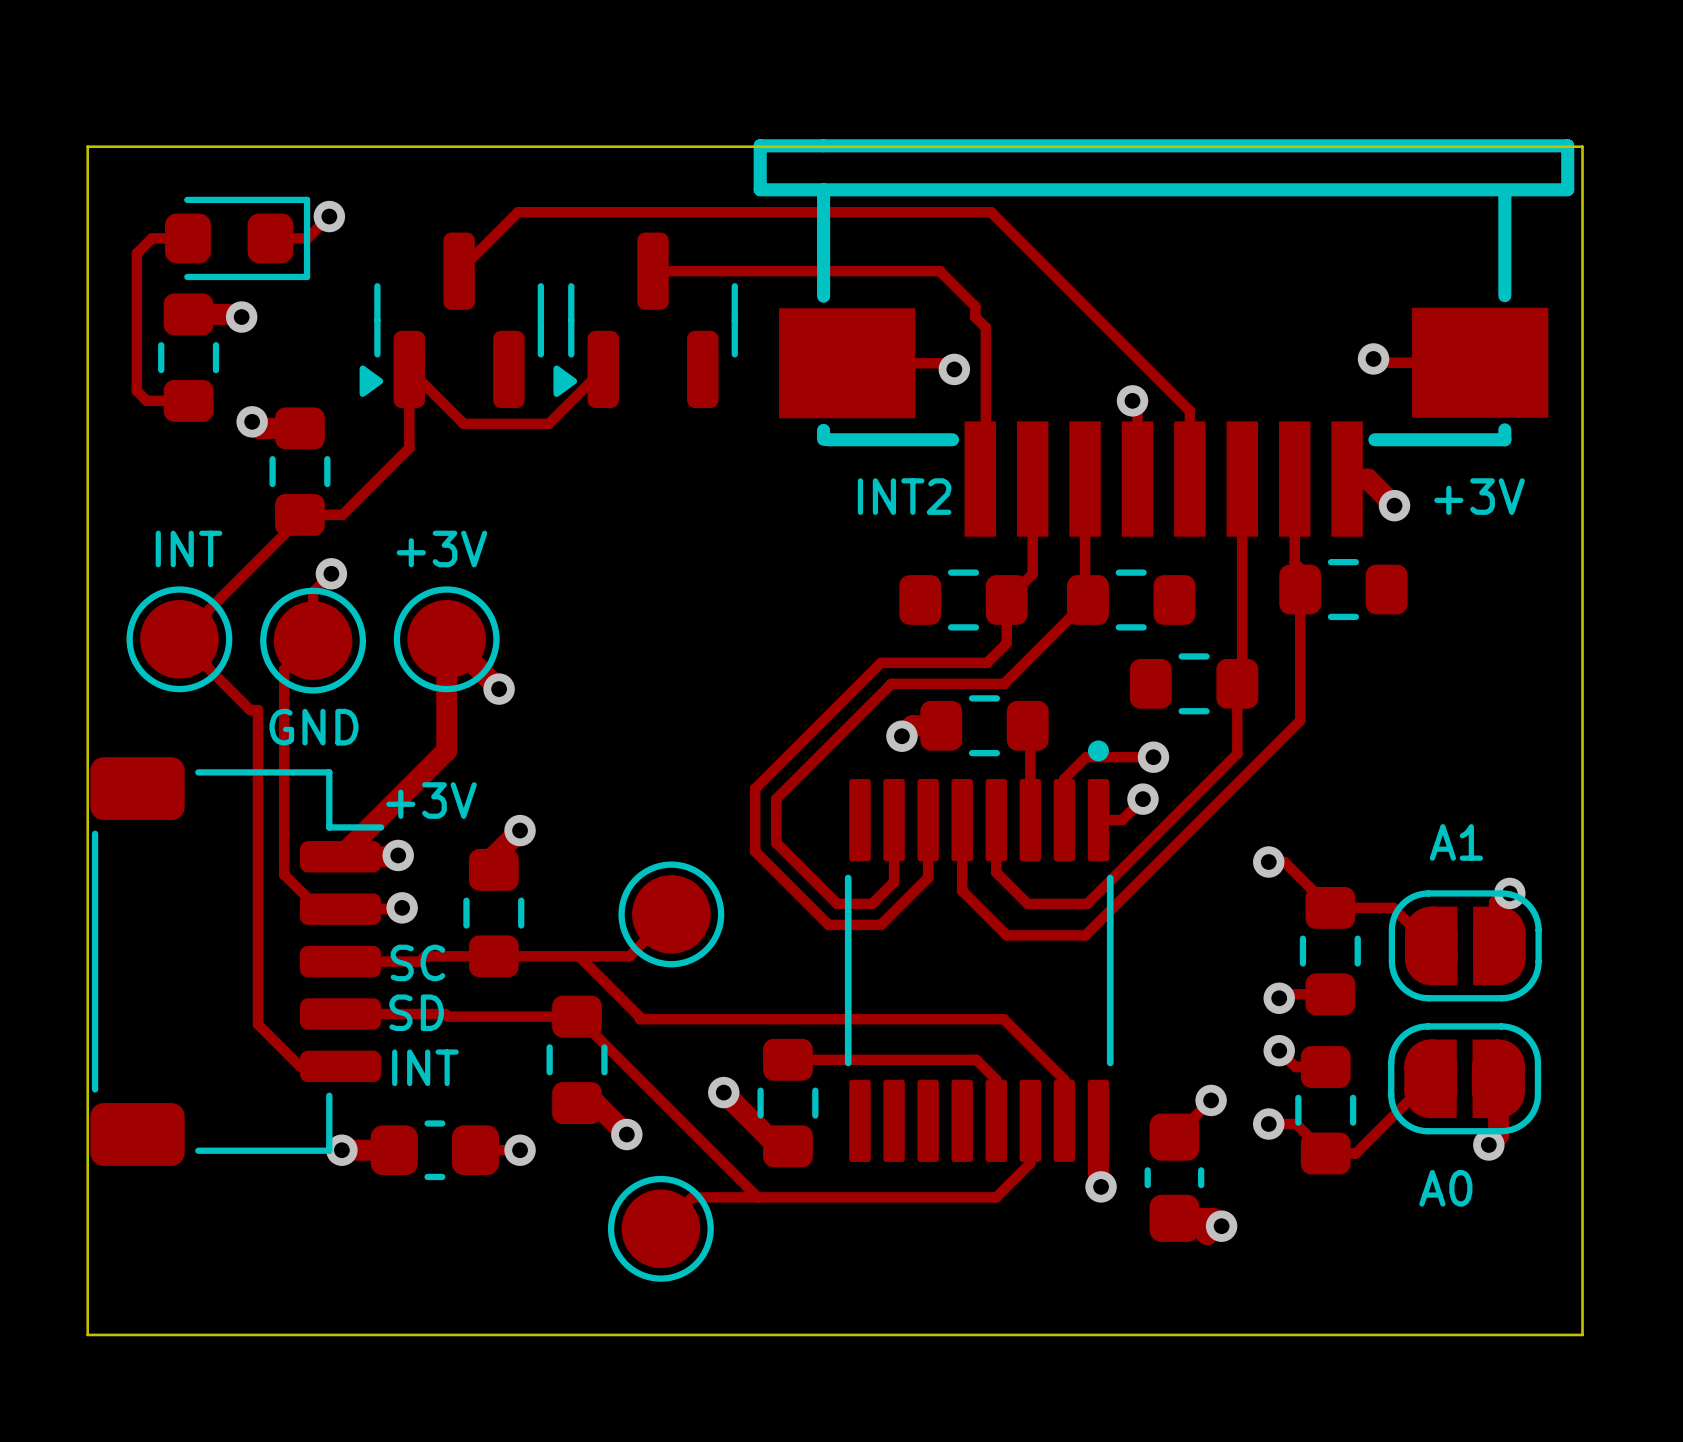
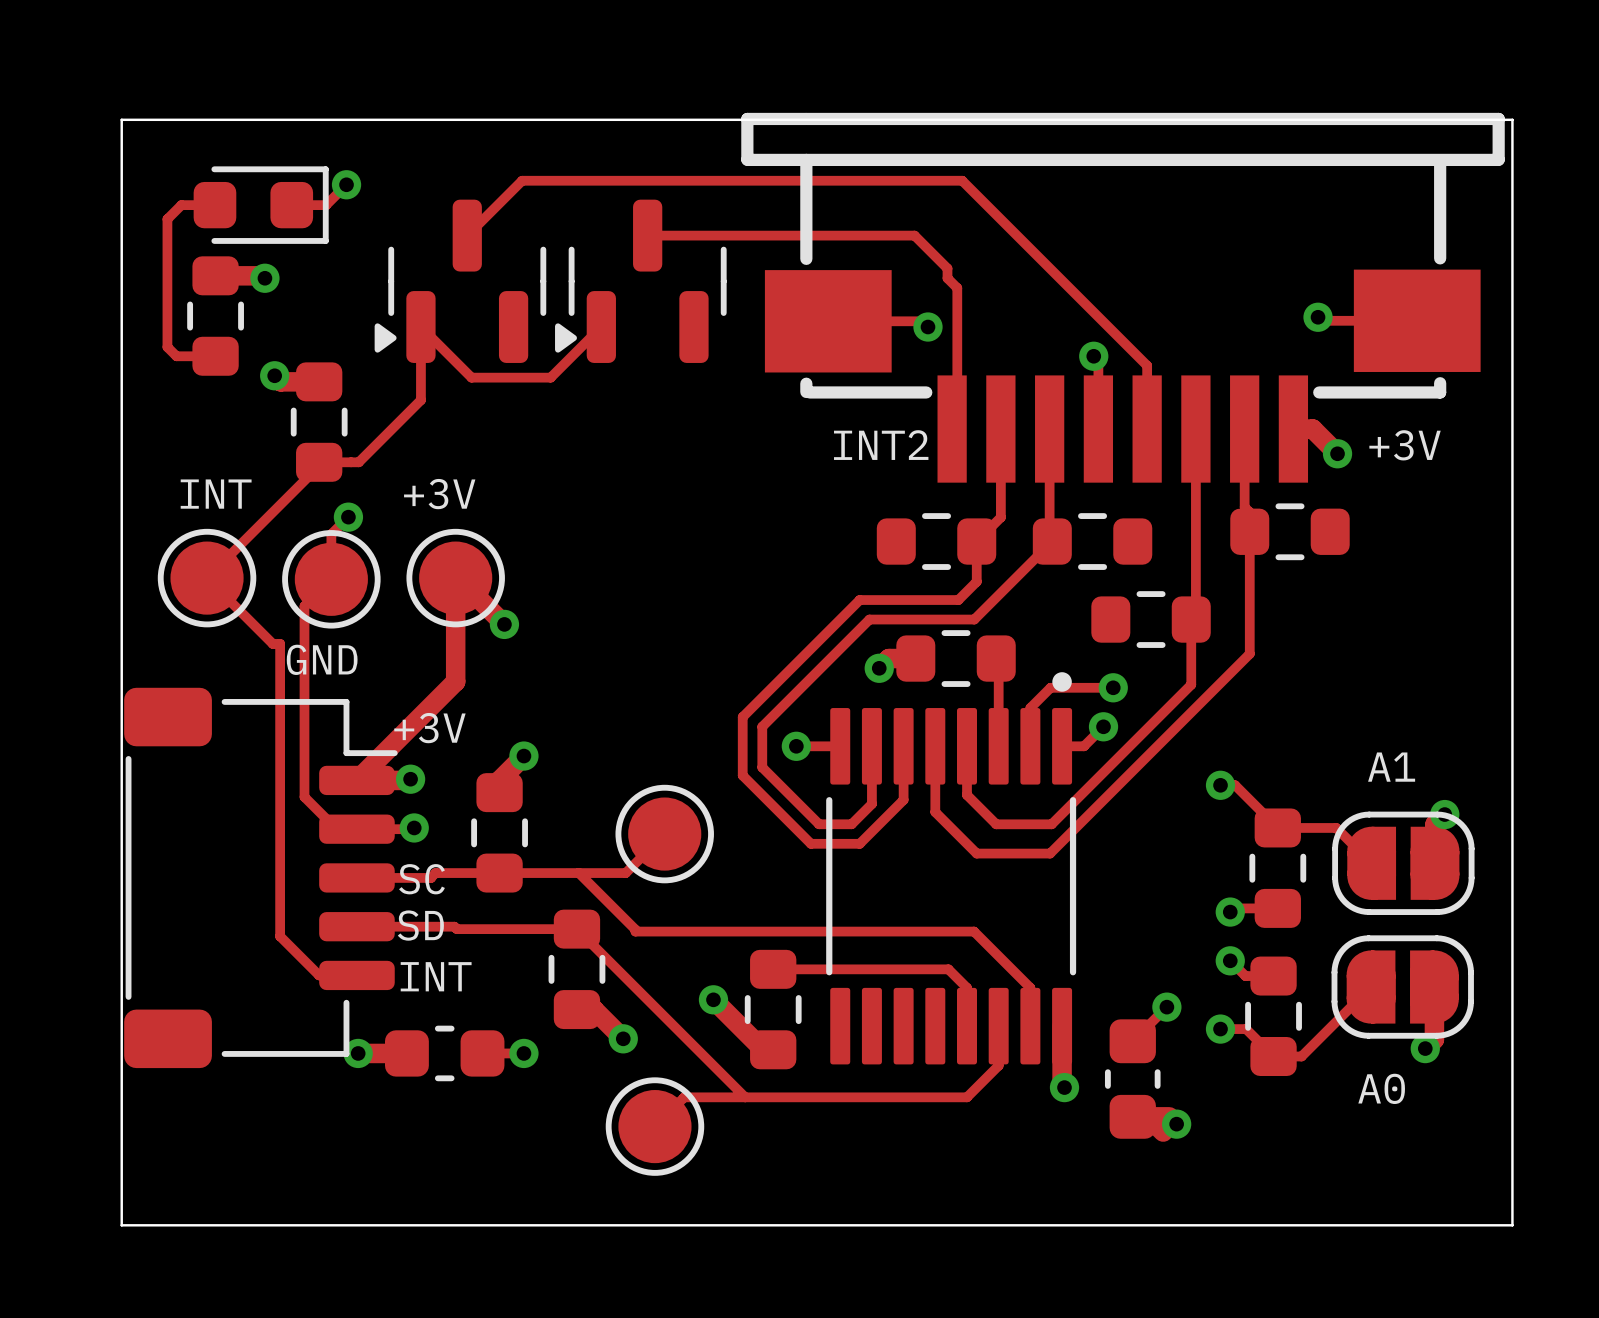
track: none -> (796, 746) (840, 746)
via: none -> (796, 746)

